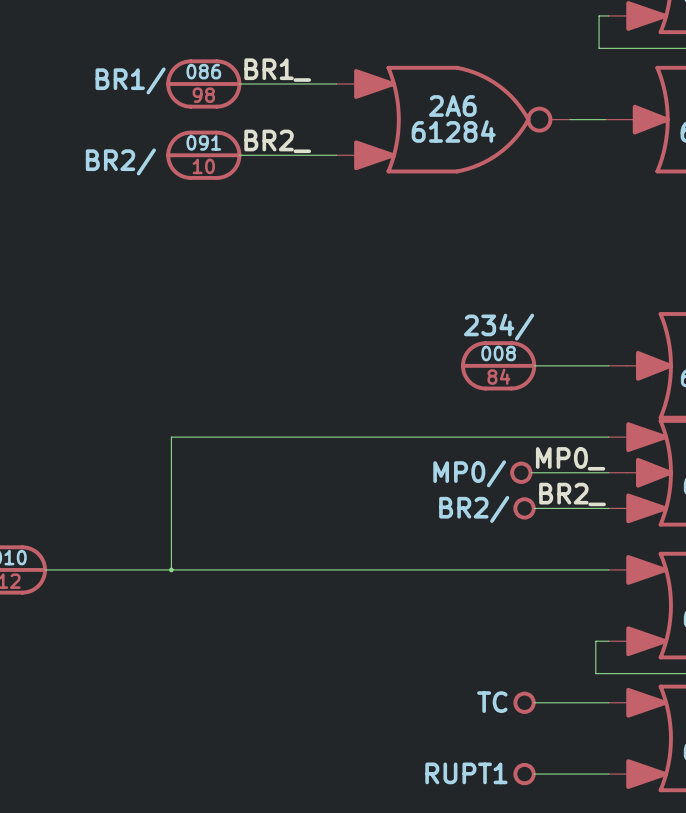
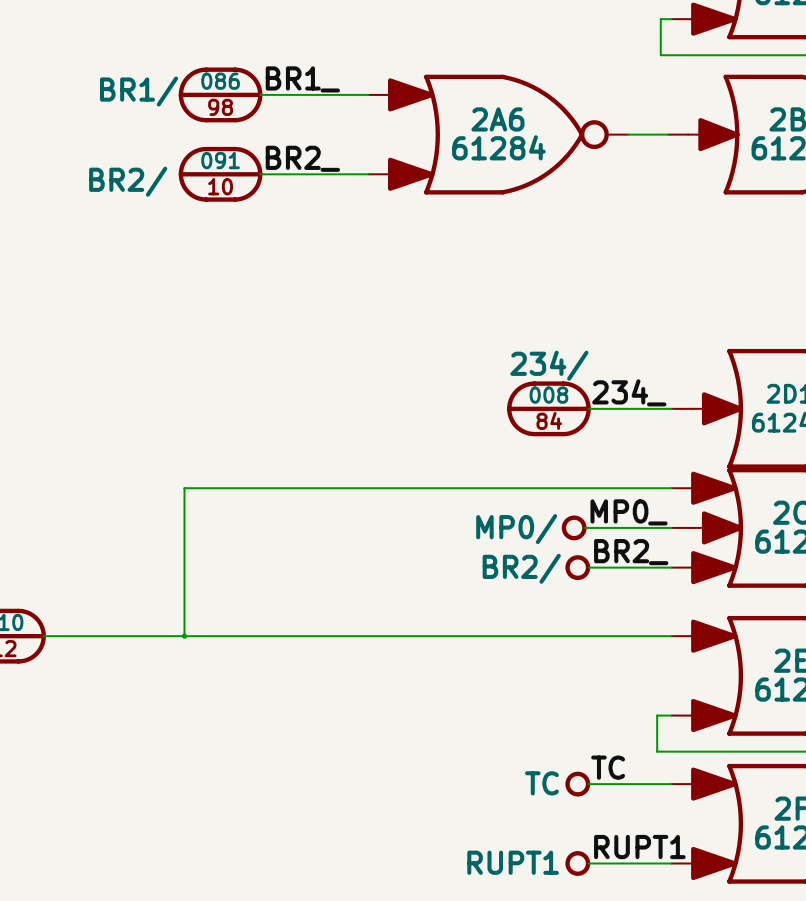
label: none -> 234_ (629, 392)
label: none -> TC (608, 767)
label: none -> RUPT1 (639, 847)

